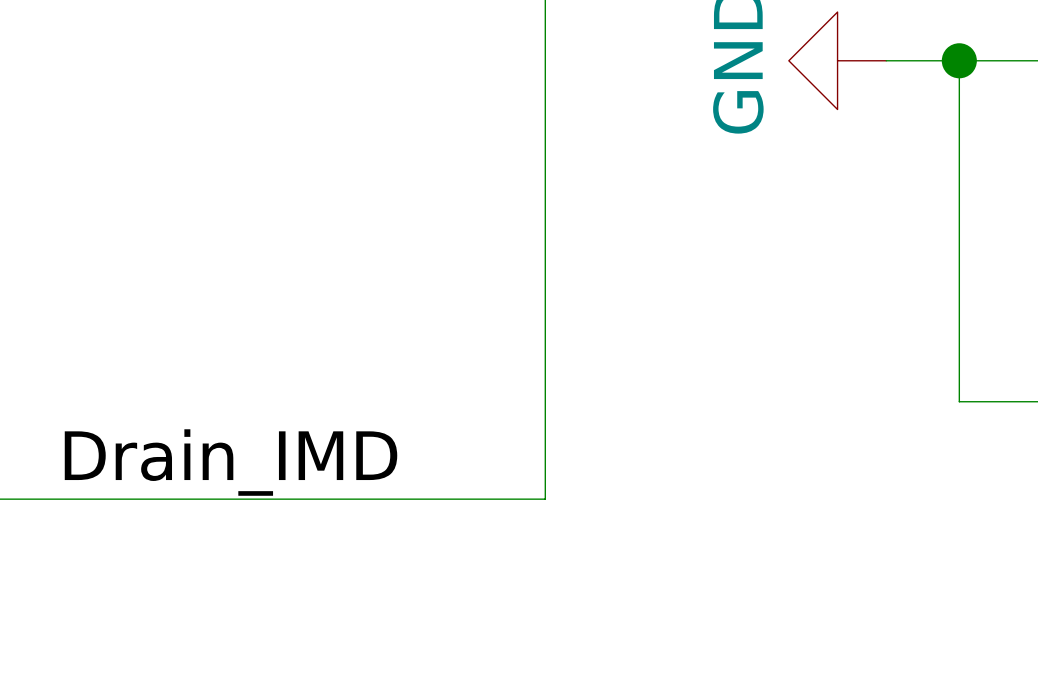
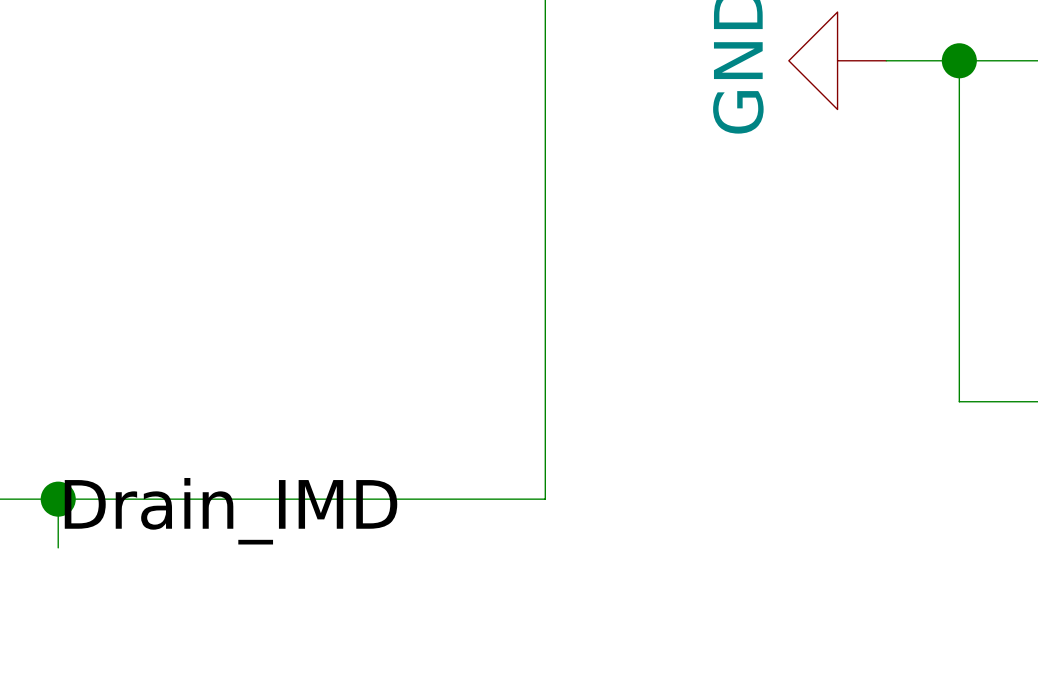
label position: Drain_IMD (231, 462) -> Drain_IMD (231, 511)
wire: none -> (58, 499) (58, 547)
junction: none -> (58, 499)

